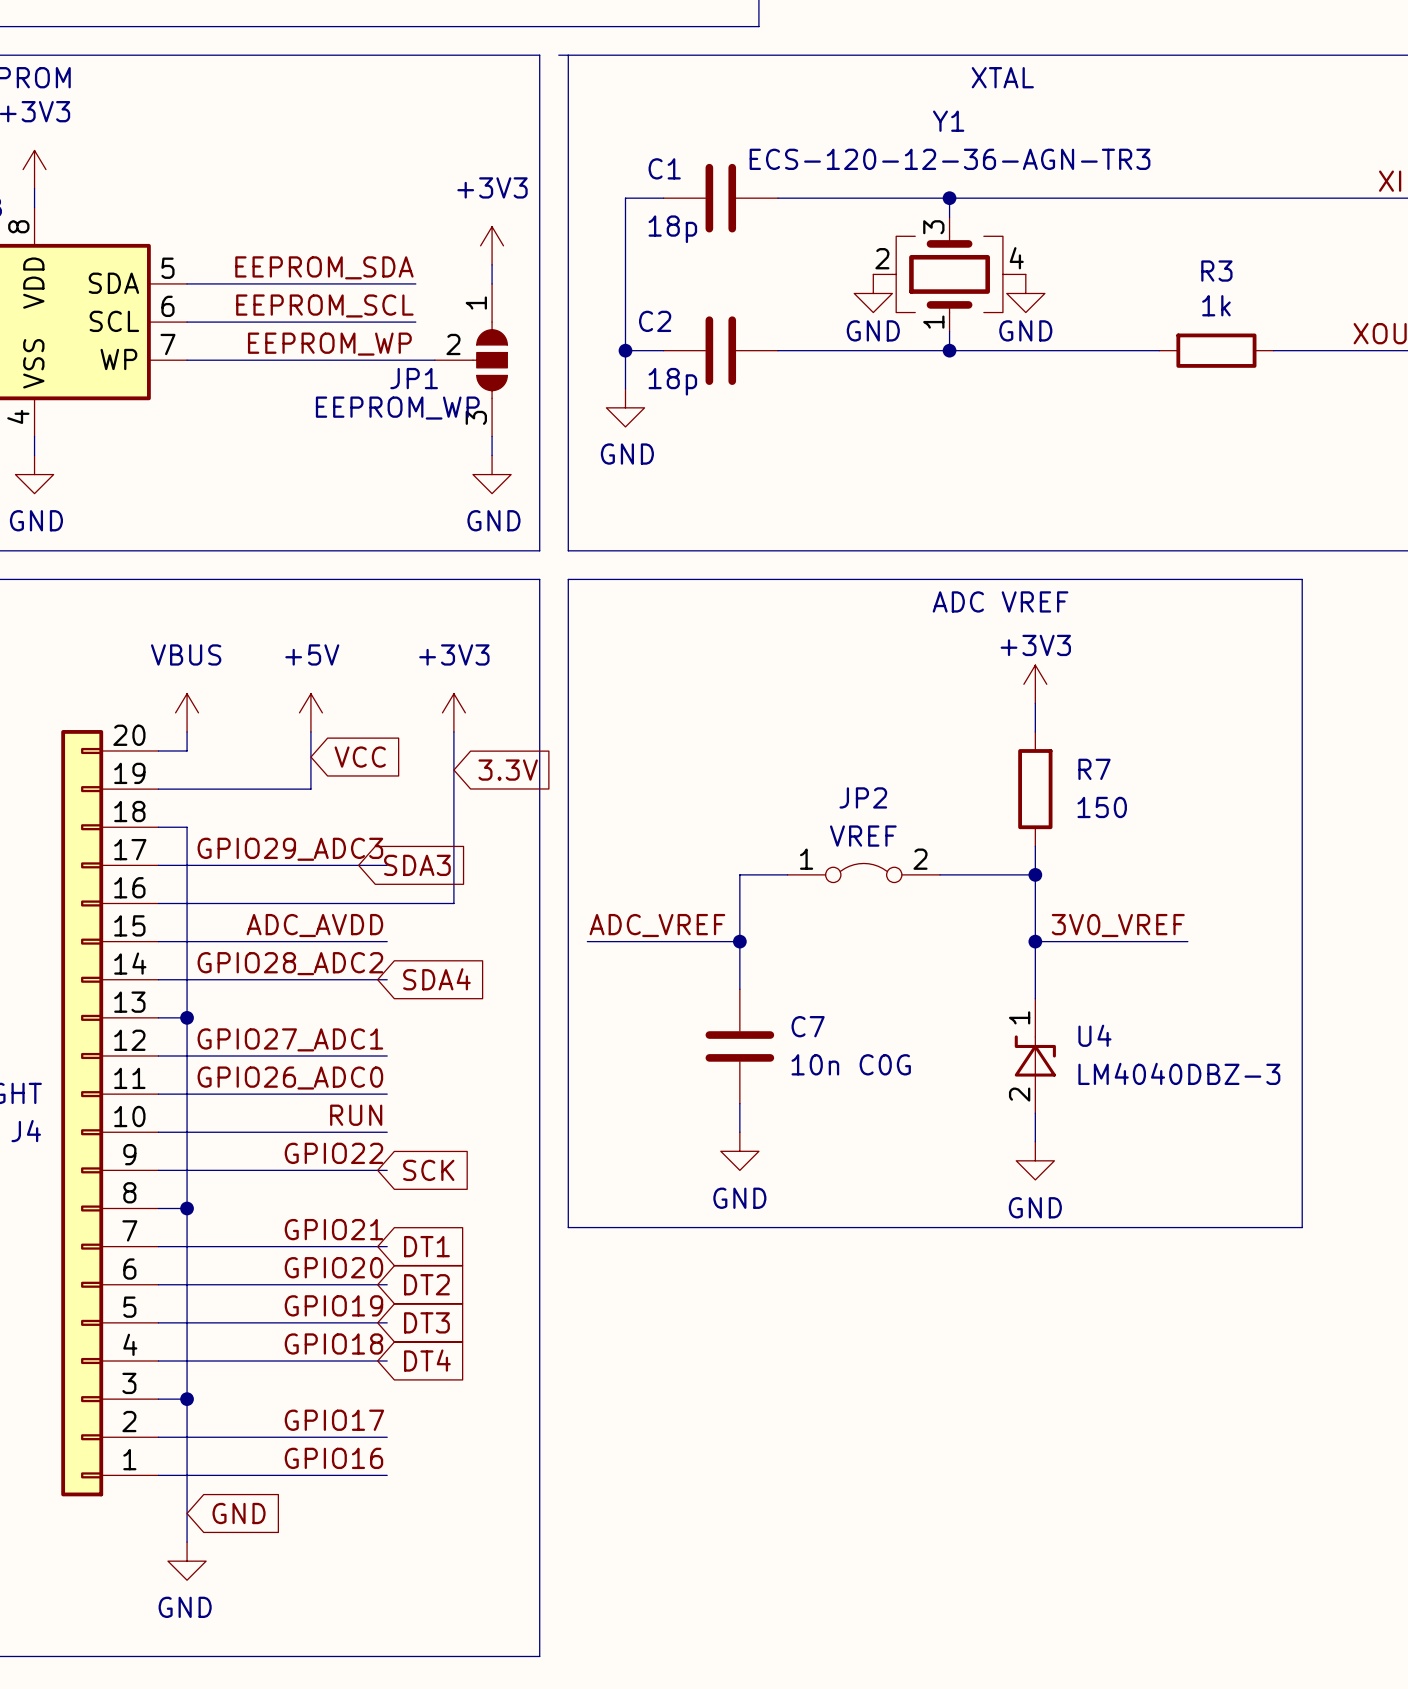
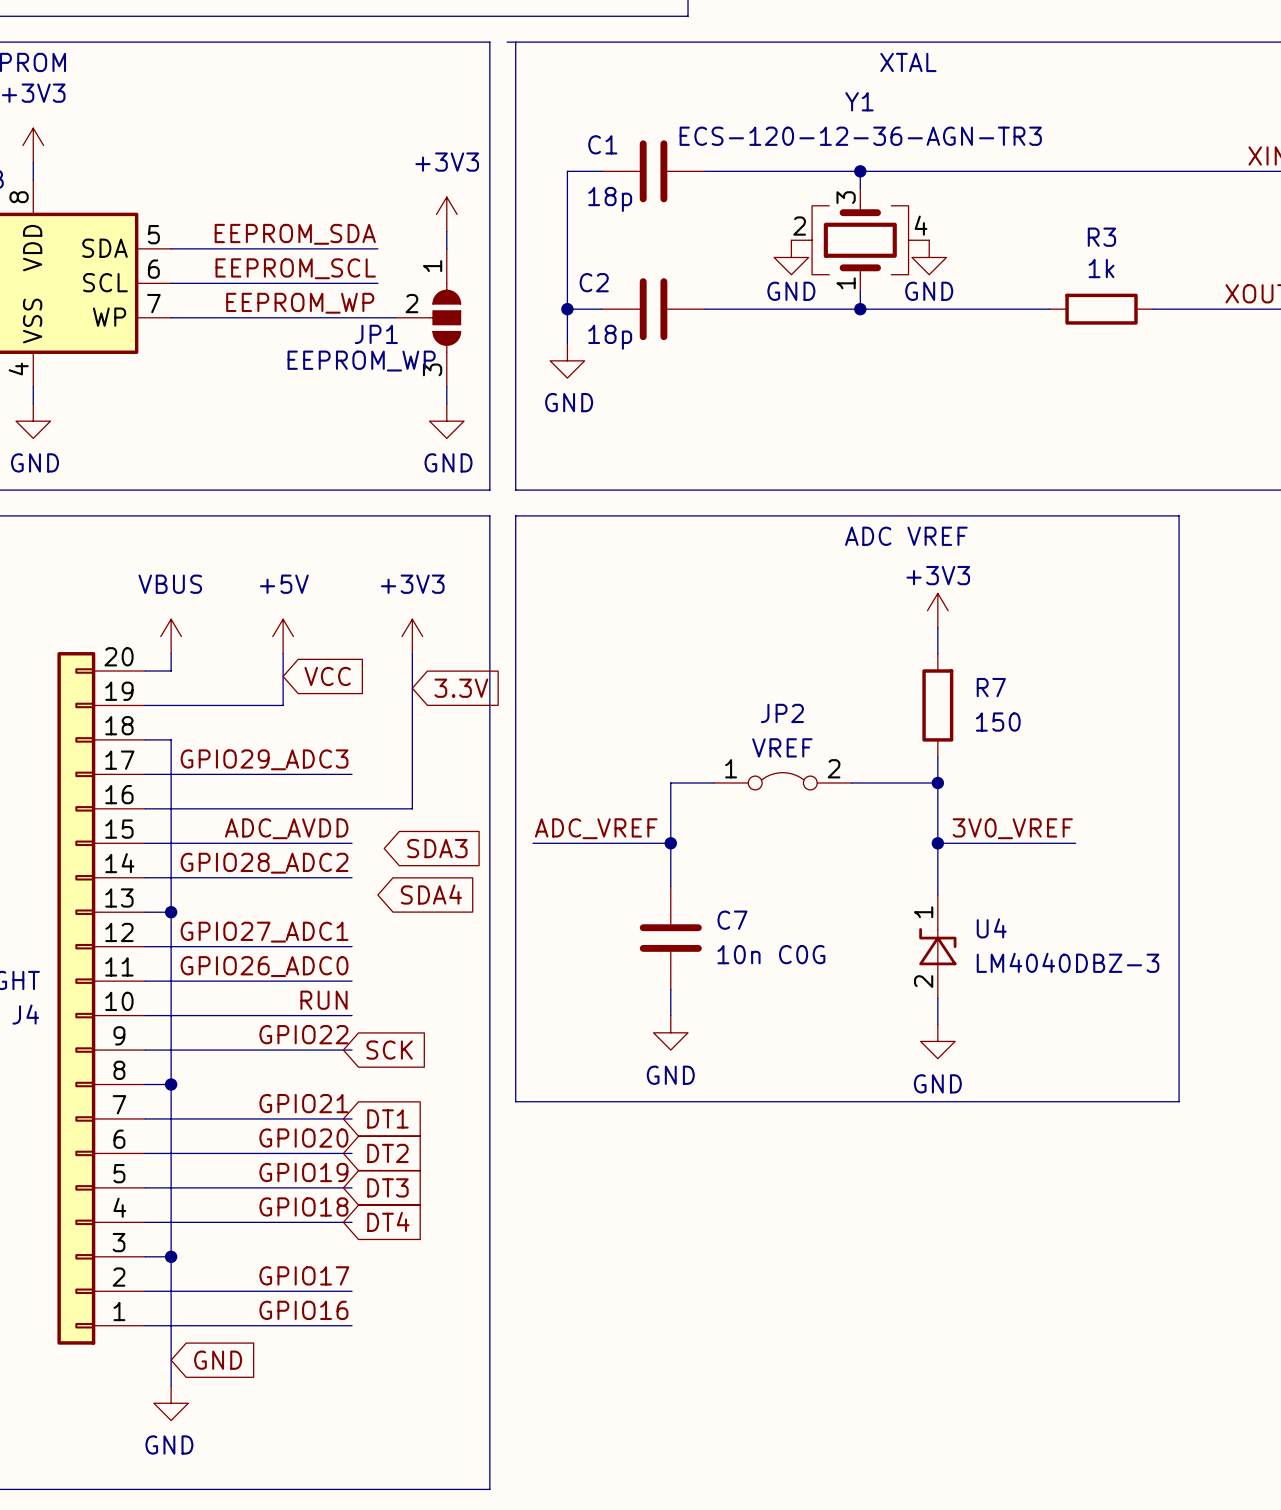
global label position: SDA3 (417, 865) -> SDA3 (437, 848)
global label position: SDA4 (436, 979) -> SDA4 (431, 894)

